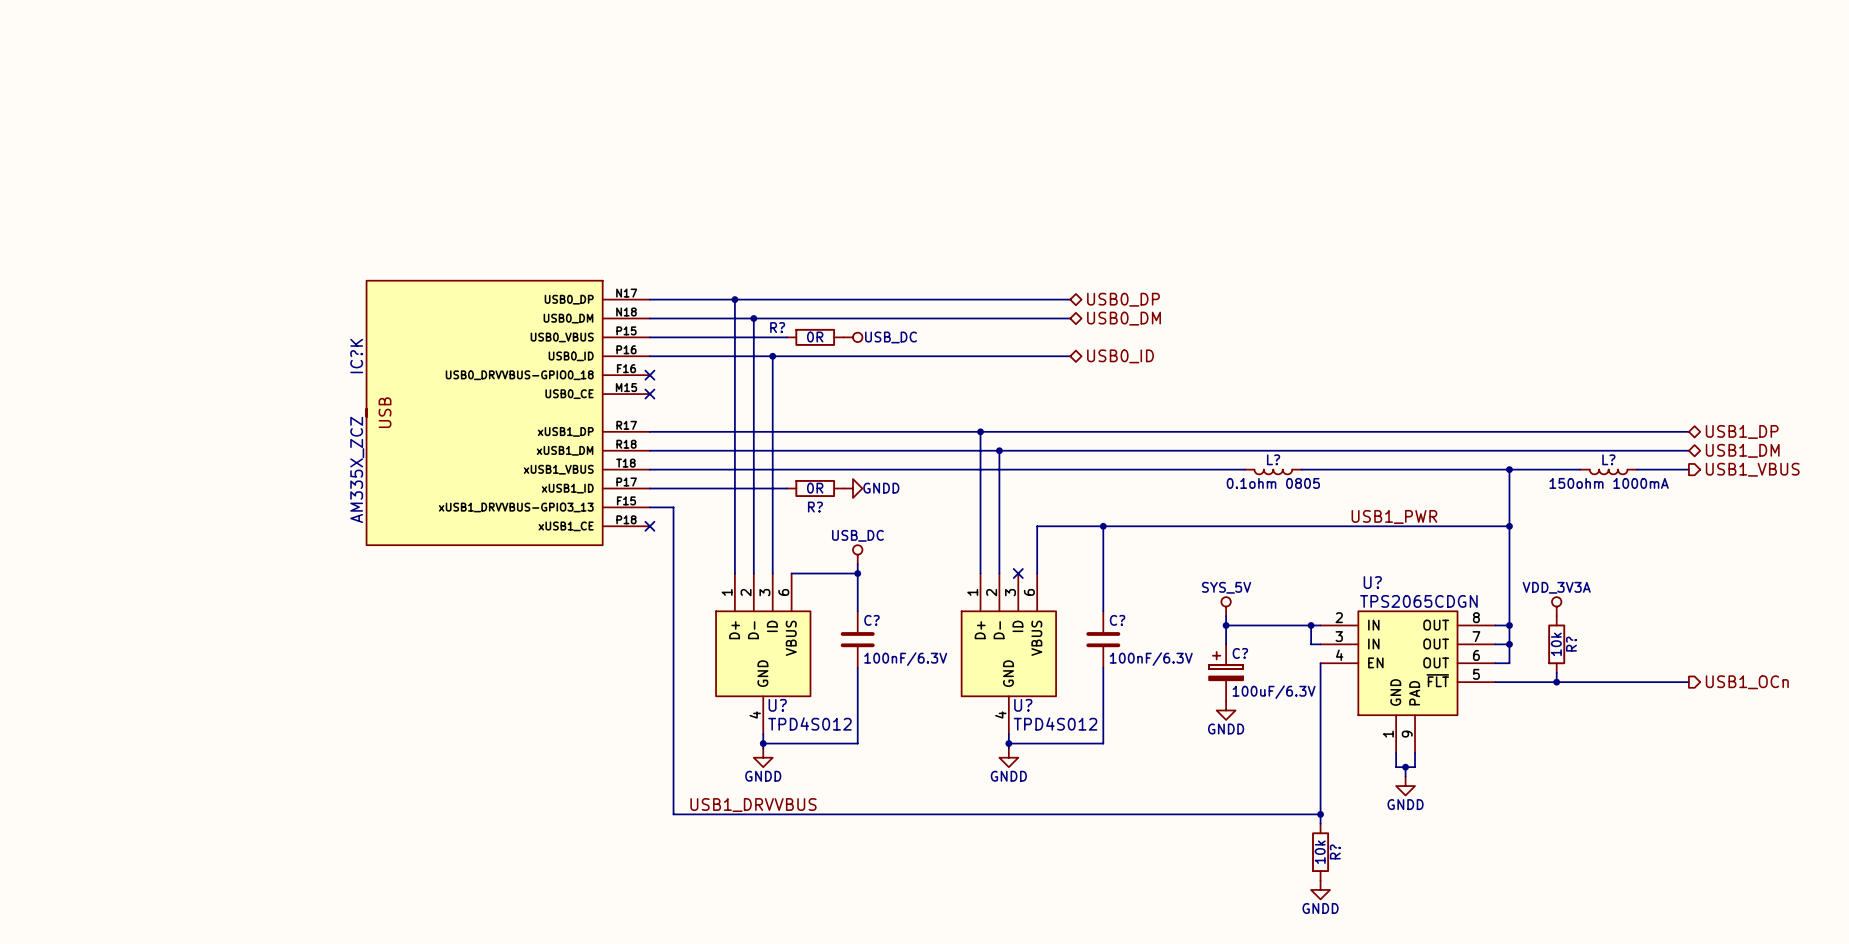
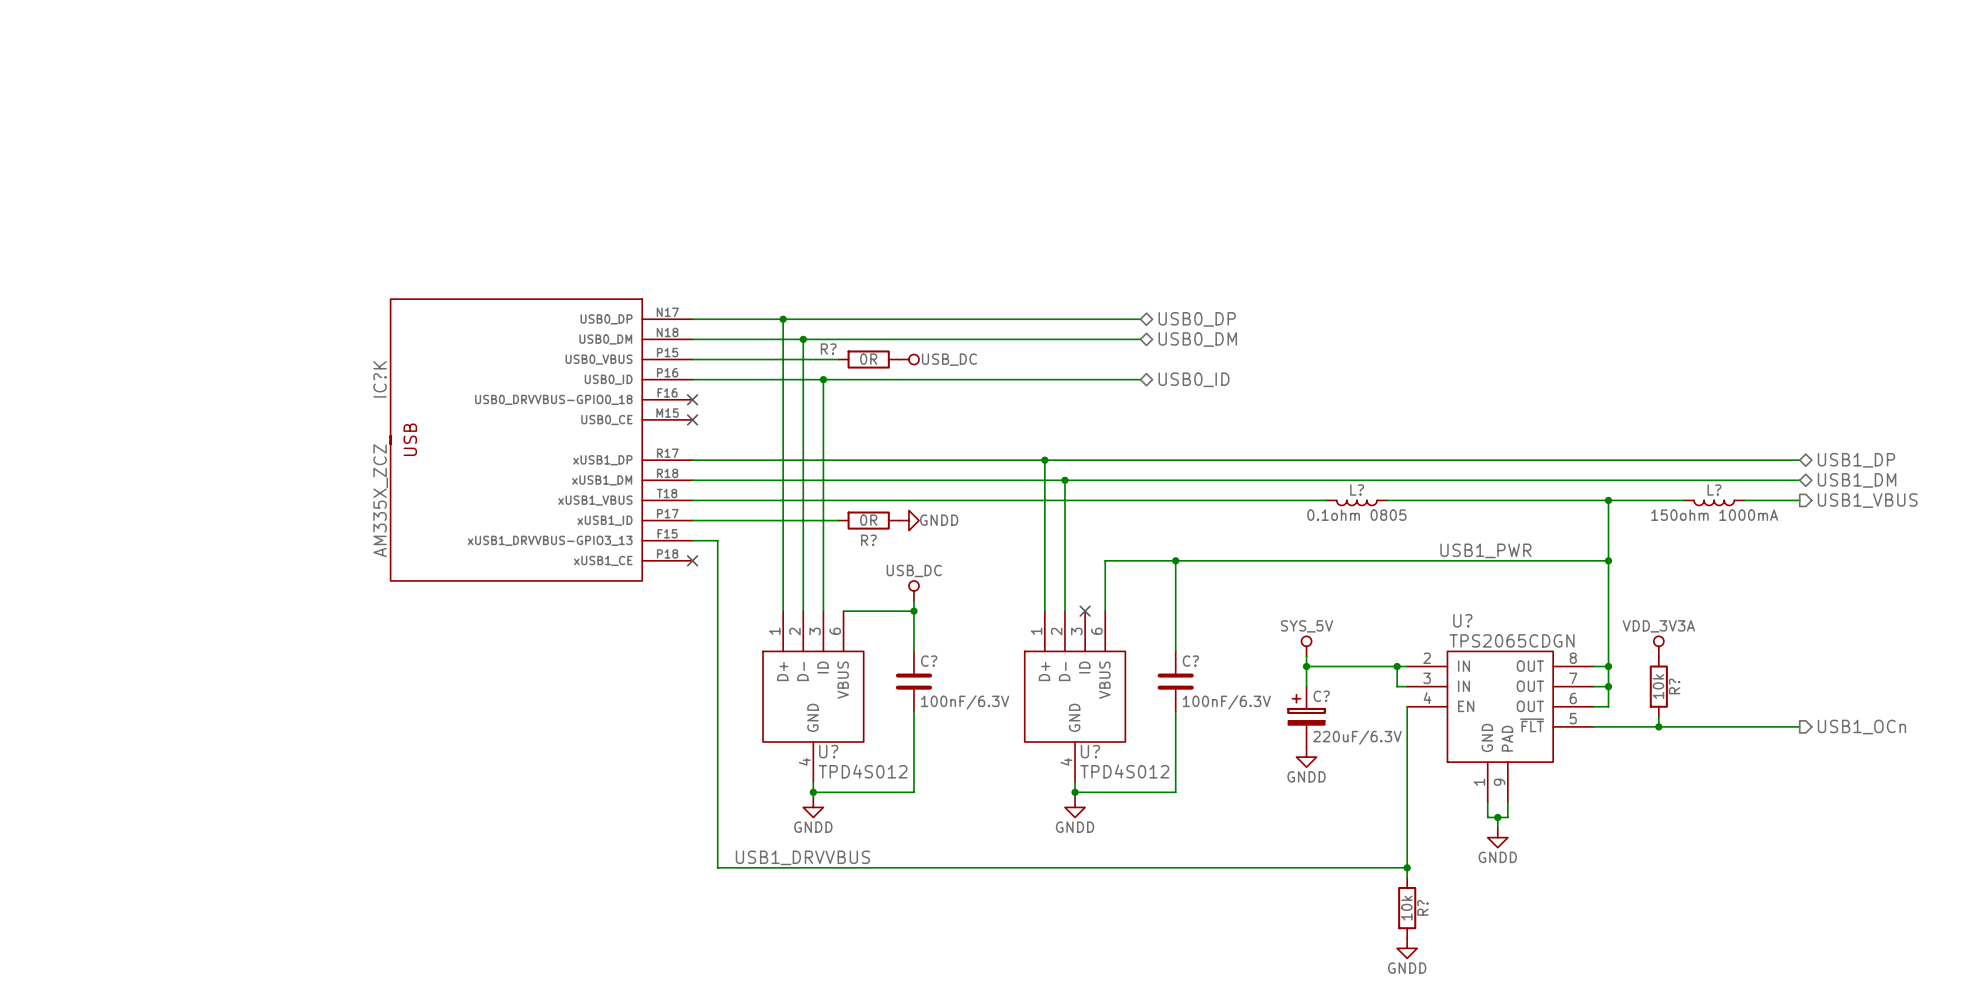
C? value: 100uF/6.3V (1274, 692) -> 220uF/6.3V (1357, 737)

